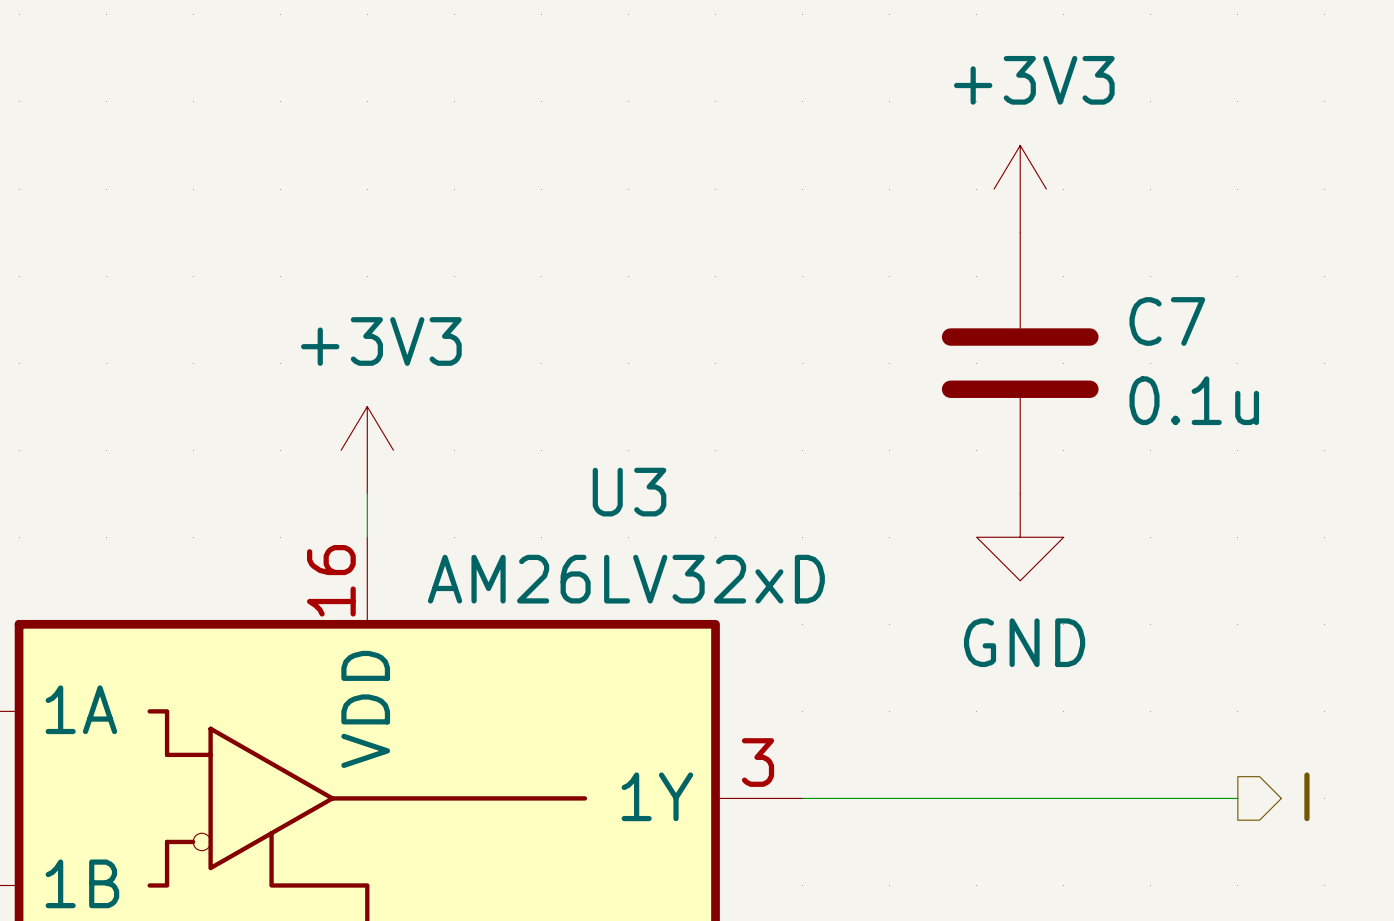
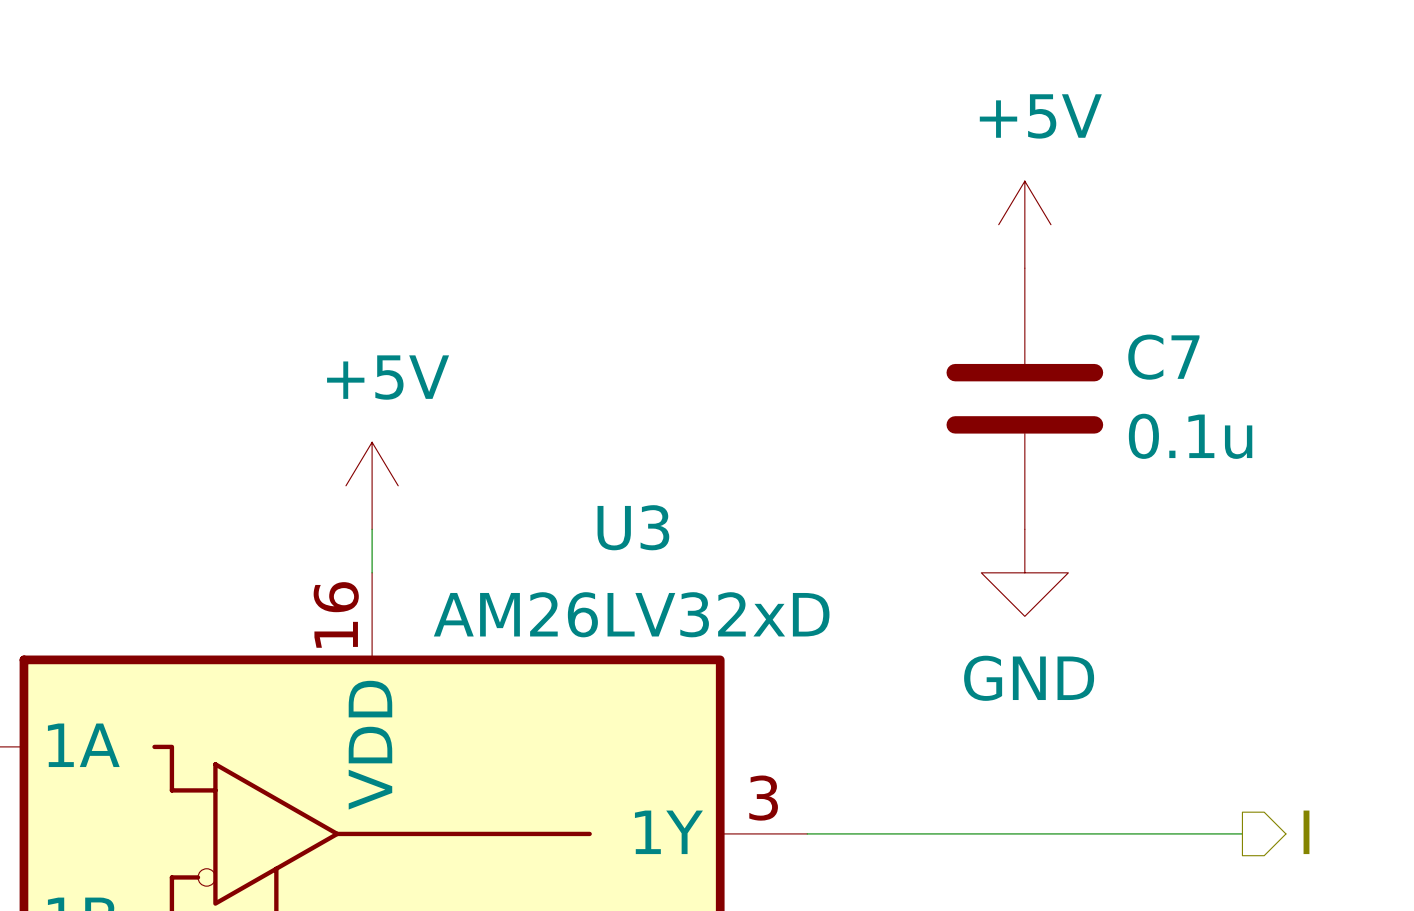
power symbol: +3V3 (1020, 189) -> +5V (1024, 224)
power symbol: +3V3 (367, 450) -> +5V (372, 485)

